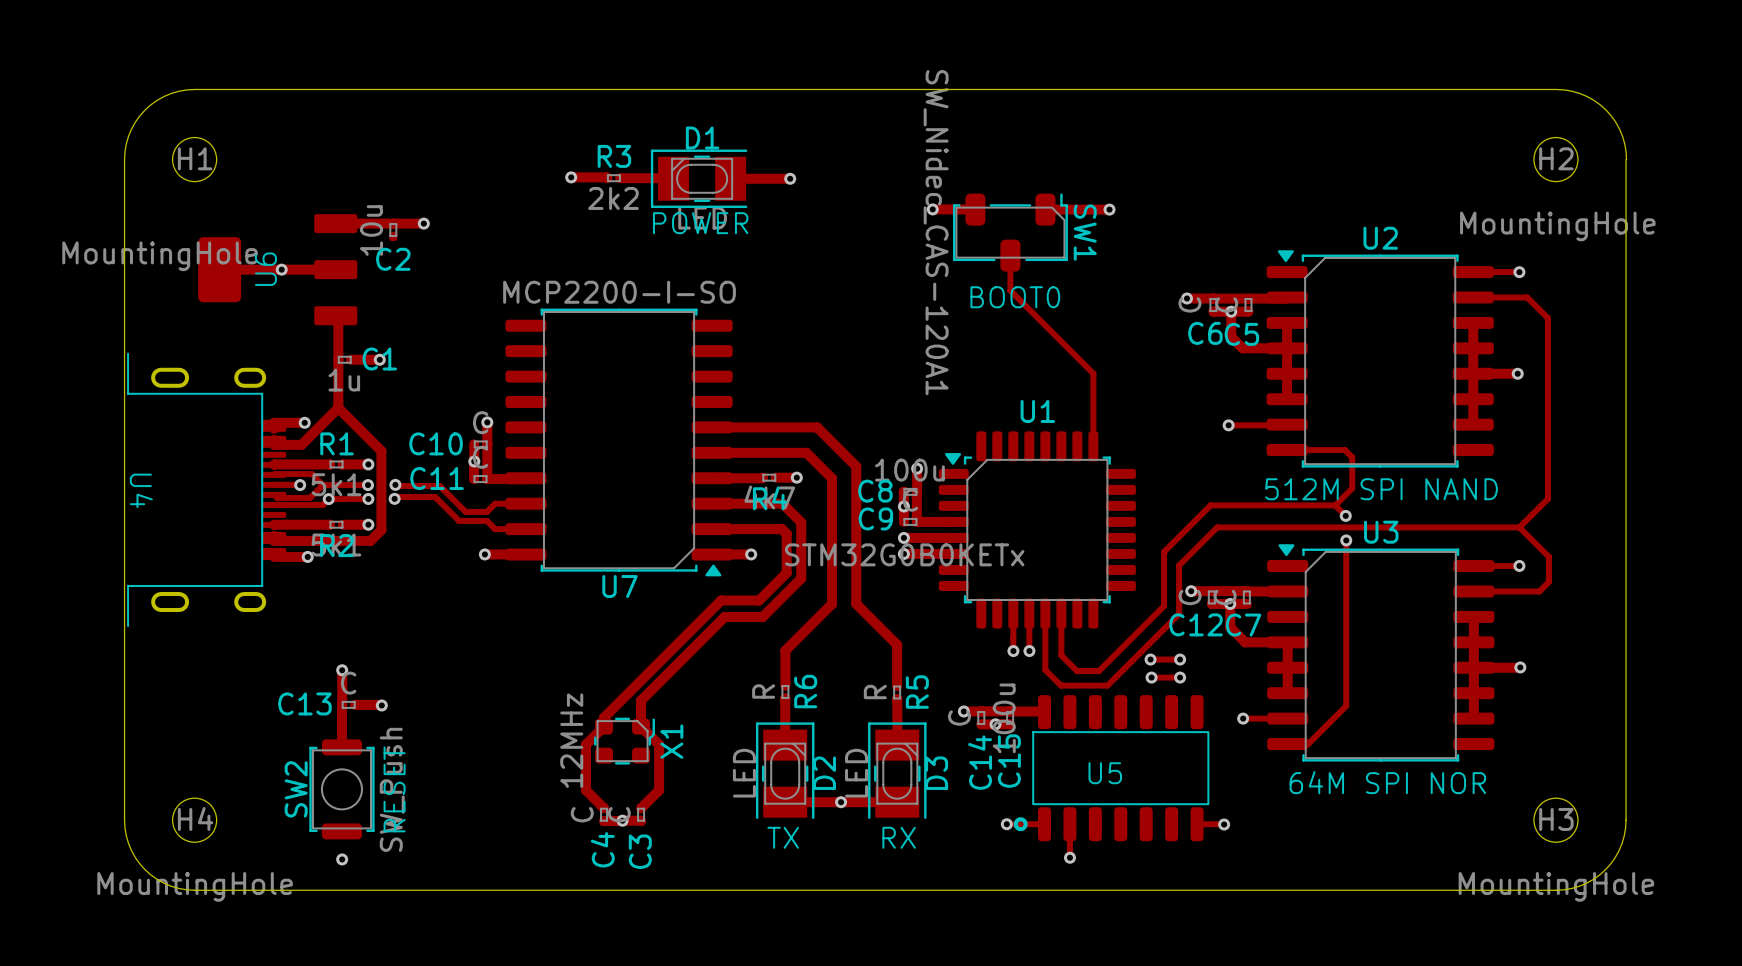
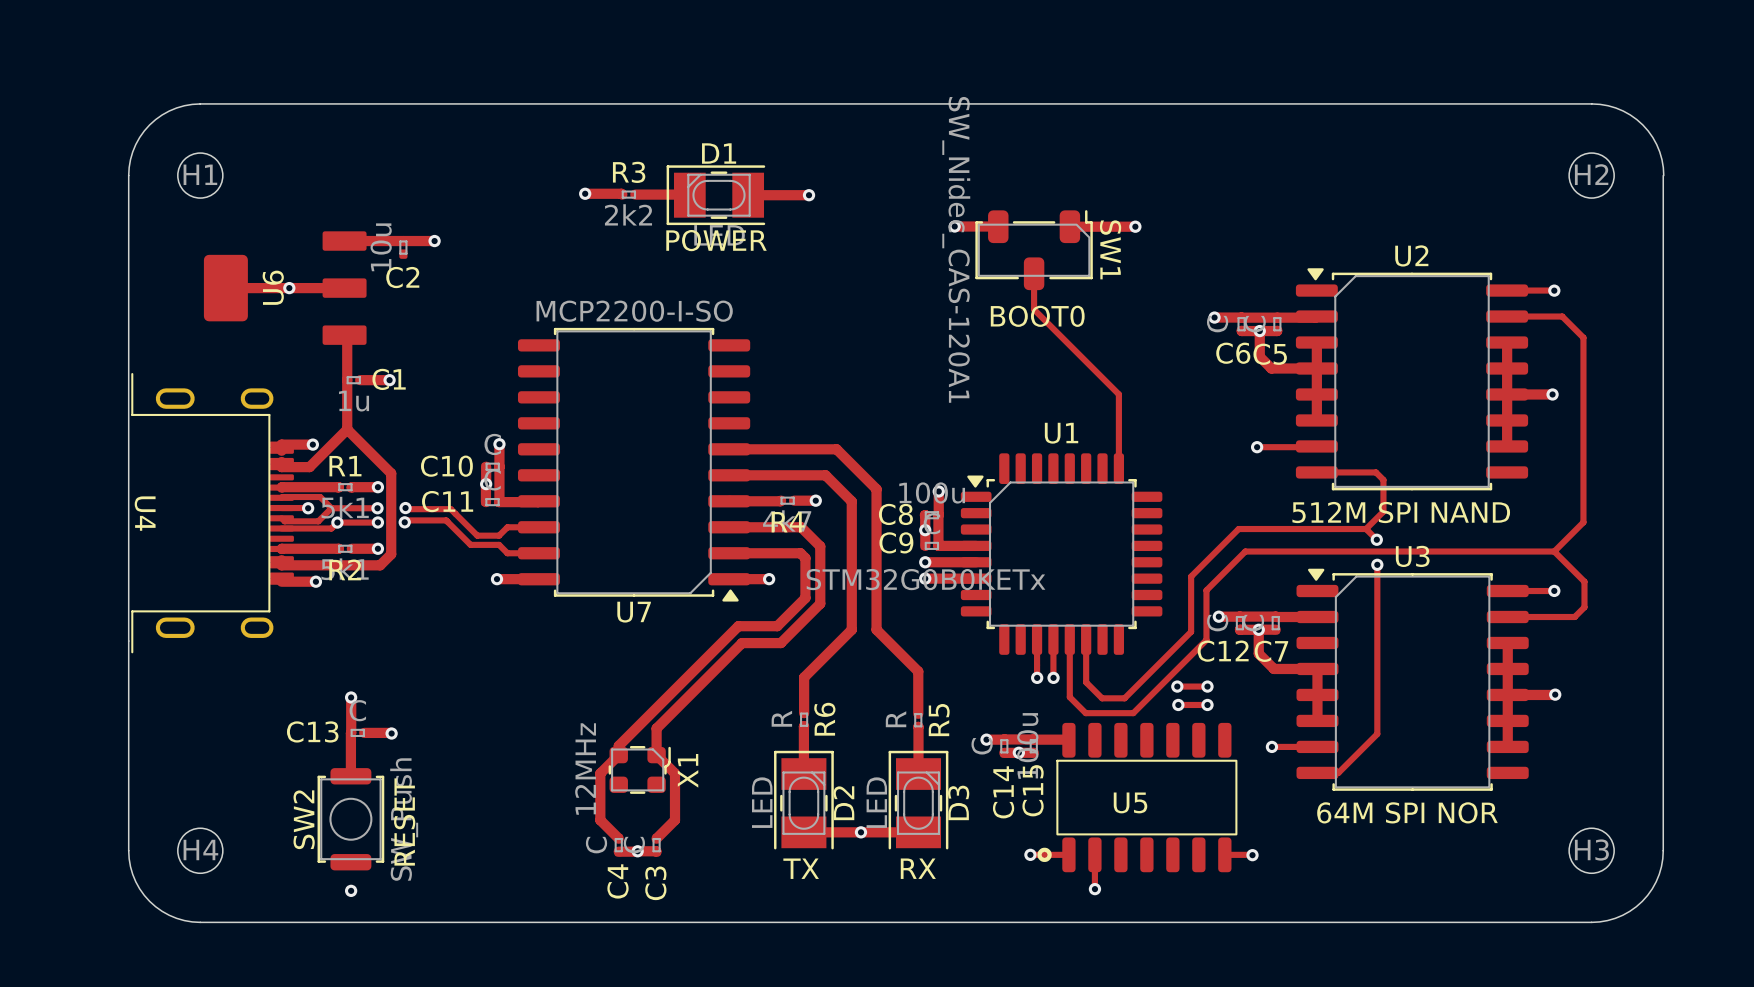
H2 value: MountingHole (1557, 226) -> none
H1 value: MountingHole (160, 256) -> none
H4 value: MountingHole (195, 886) -> none
H3 value: MountingHole (1556, 886) -> none

